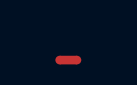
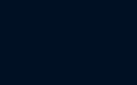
part: (68, 60) -> none

